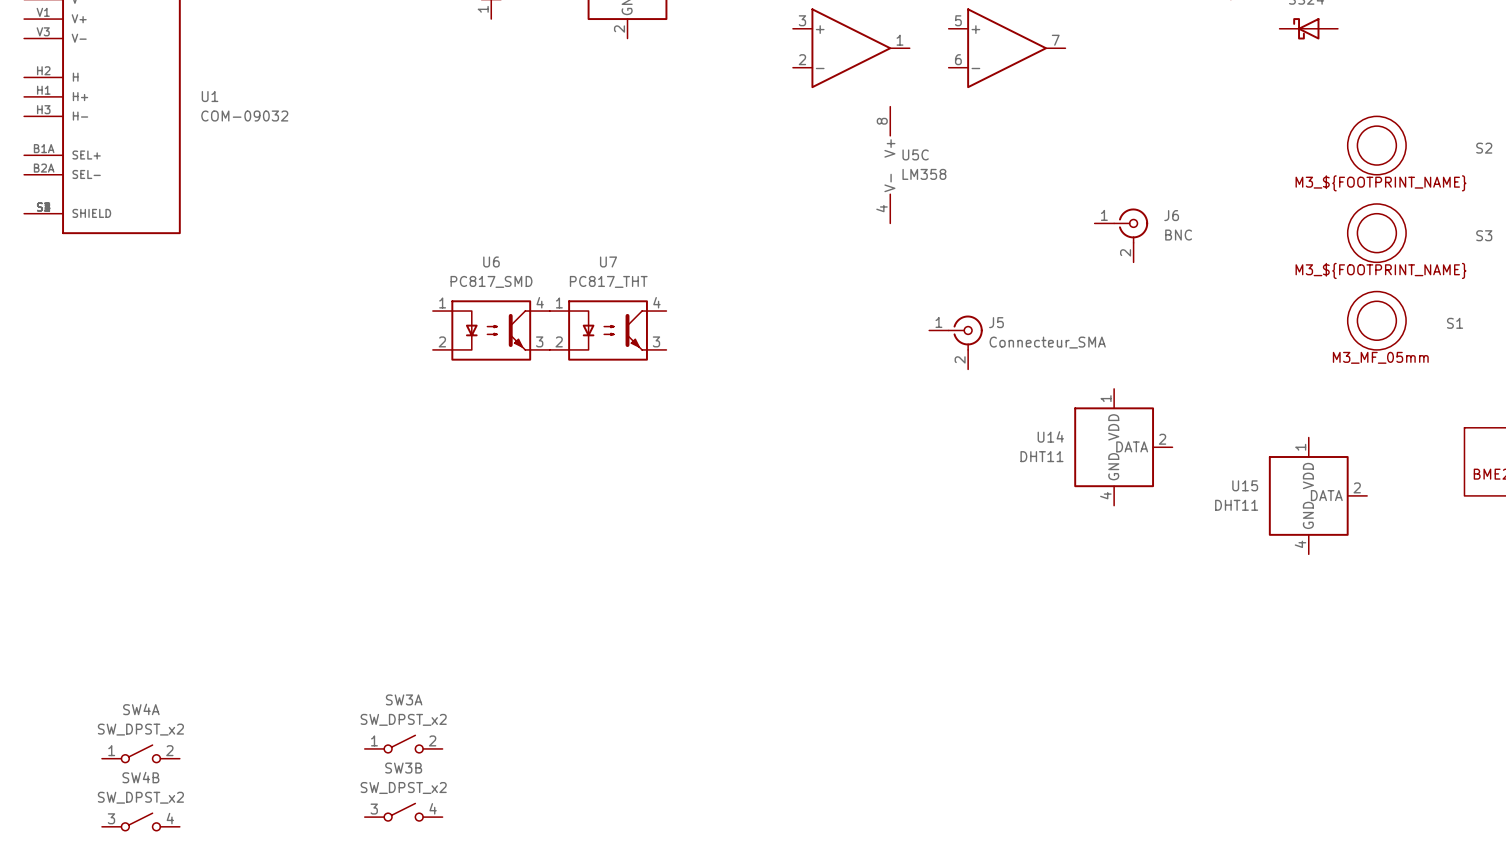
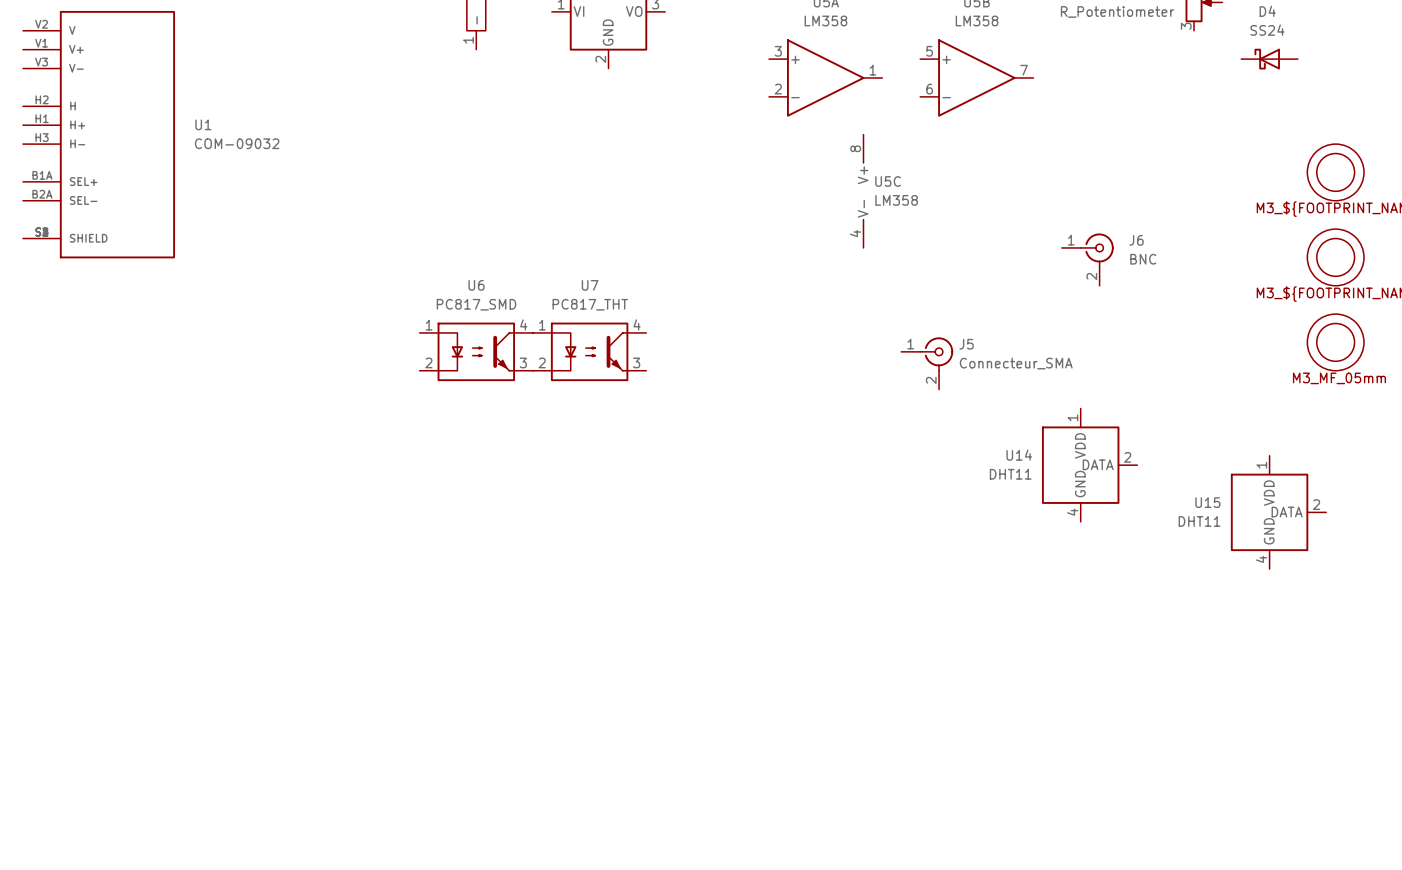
SW3A: SW_DPST_x2 (403, 744) -> none
SW4A: SW_DPST_x2 (140, 753) -> none
SW3B: SW_DPST_x2 (403, 812) -> none
SW4B: SW_DPST_x2 (140, 821) -> none

